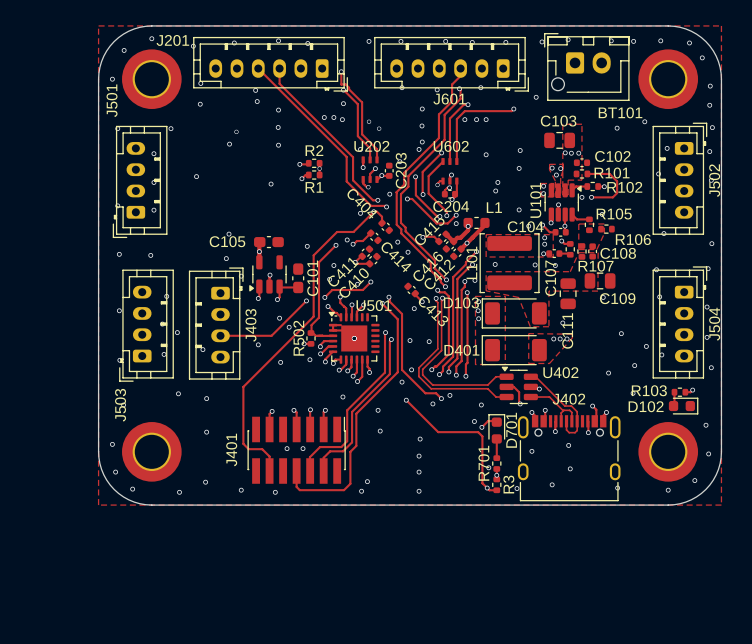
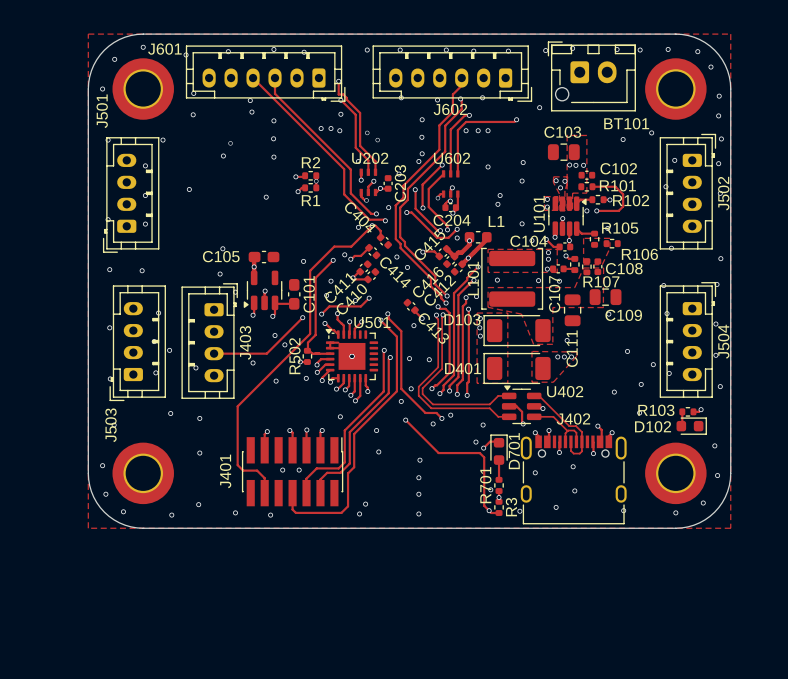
J201 name: J201 (172, 40) -> J601 (164, 49)
J601 name: J601 (449, 99) -> J602 (450, 109)

